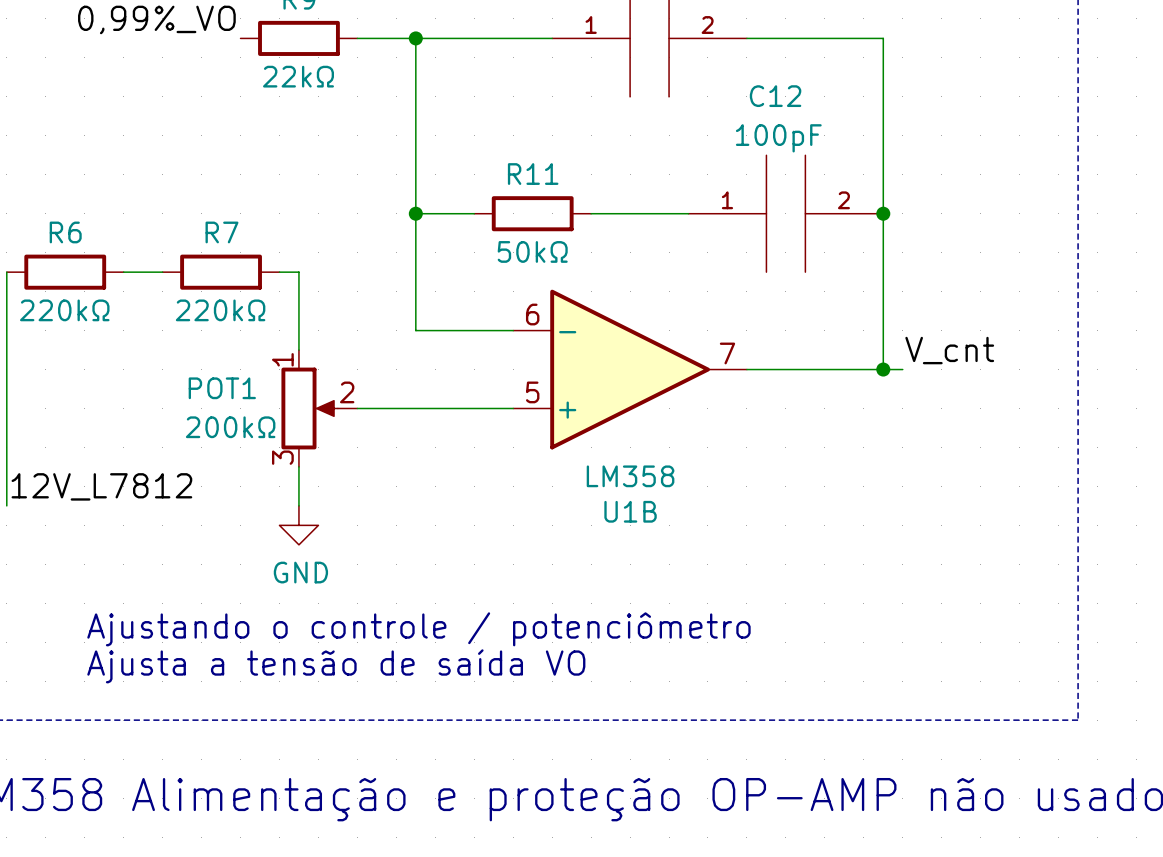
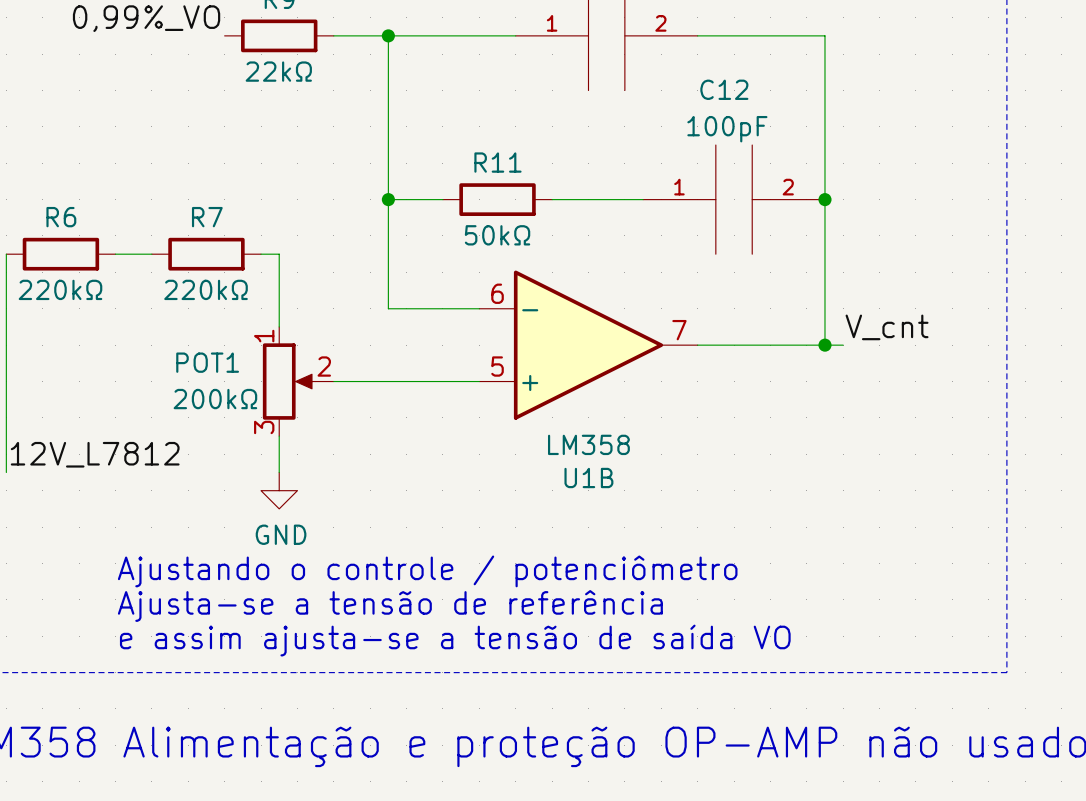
text position: Ajustando o controle / potenciômetro (418, 629) -> Ajustando o controle / potenciômetro (427, 571)
text: none -> Ajusta-se a tensão de referência (390, 605)
text: Ajusta a tensão de saída VO (336, 666) -> none
text: none -> e assim ajusta-se a tensão de saída VO (455, 640)

